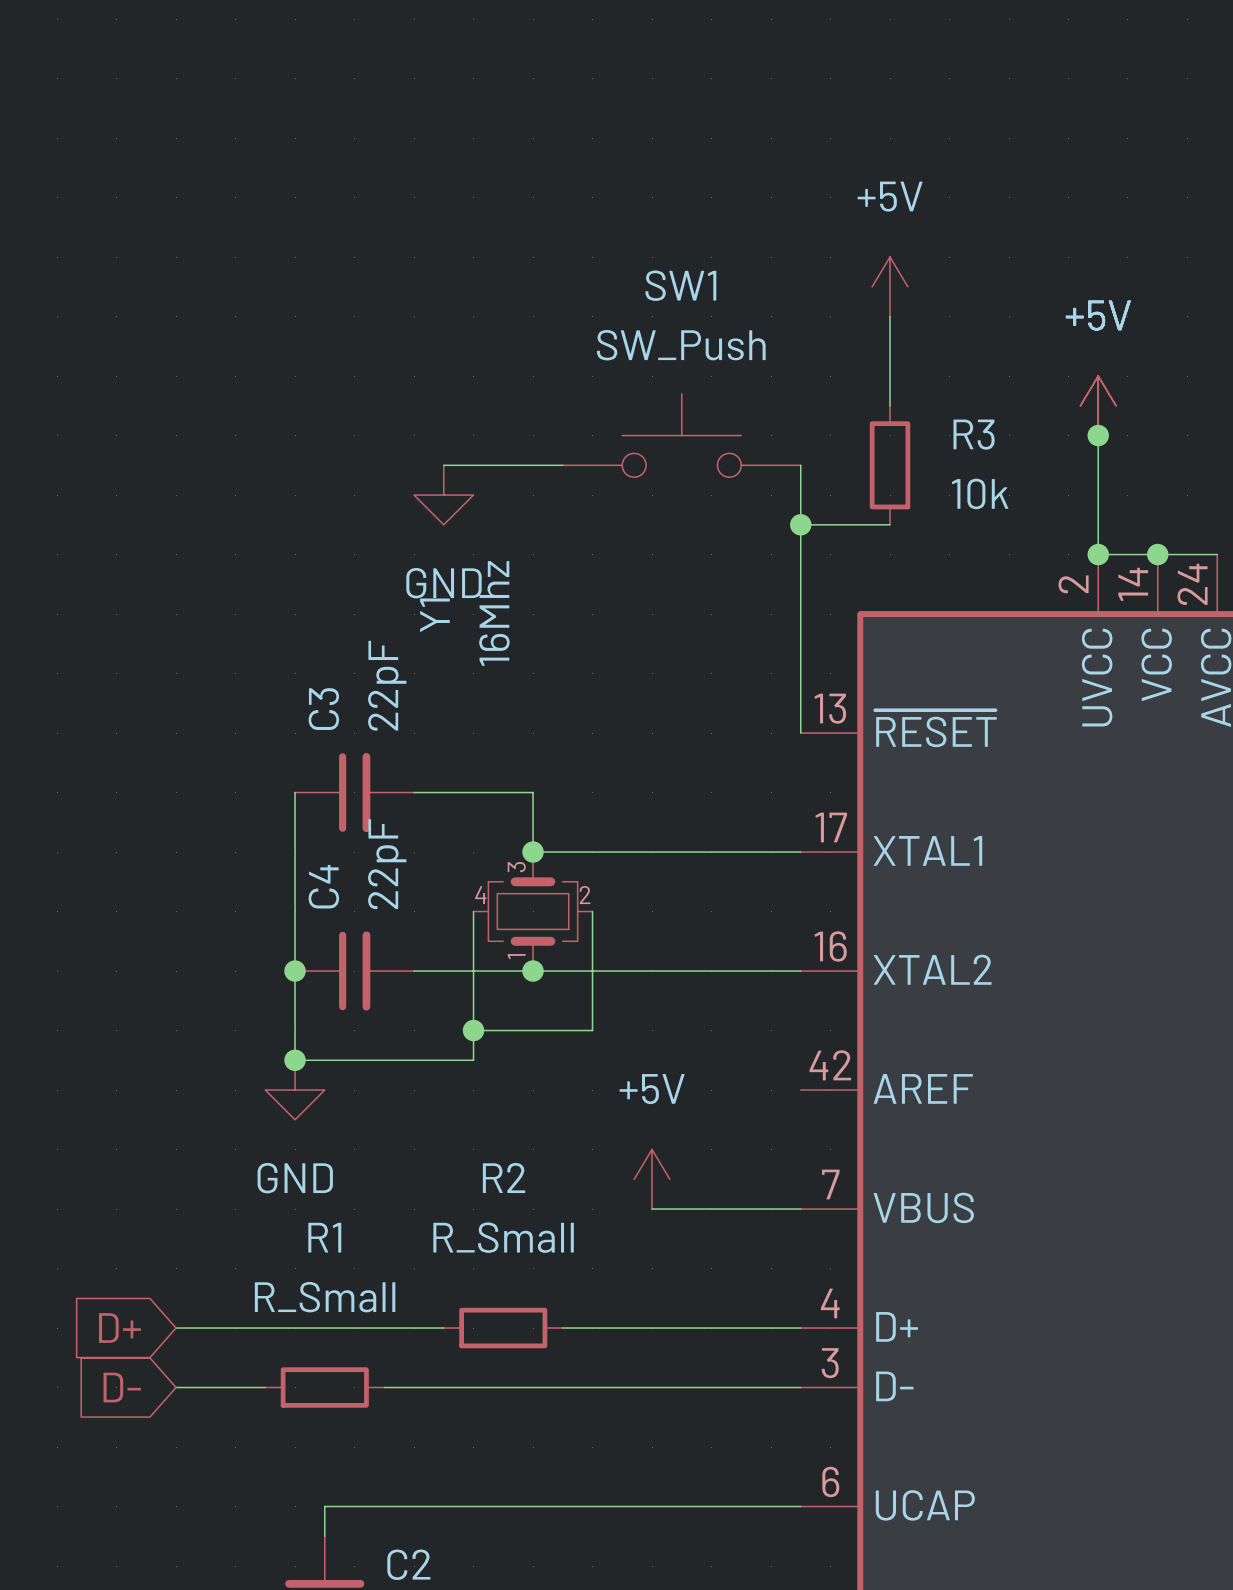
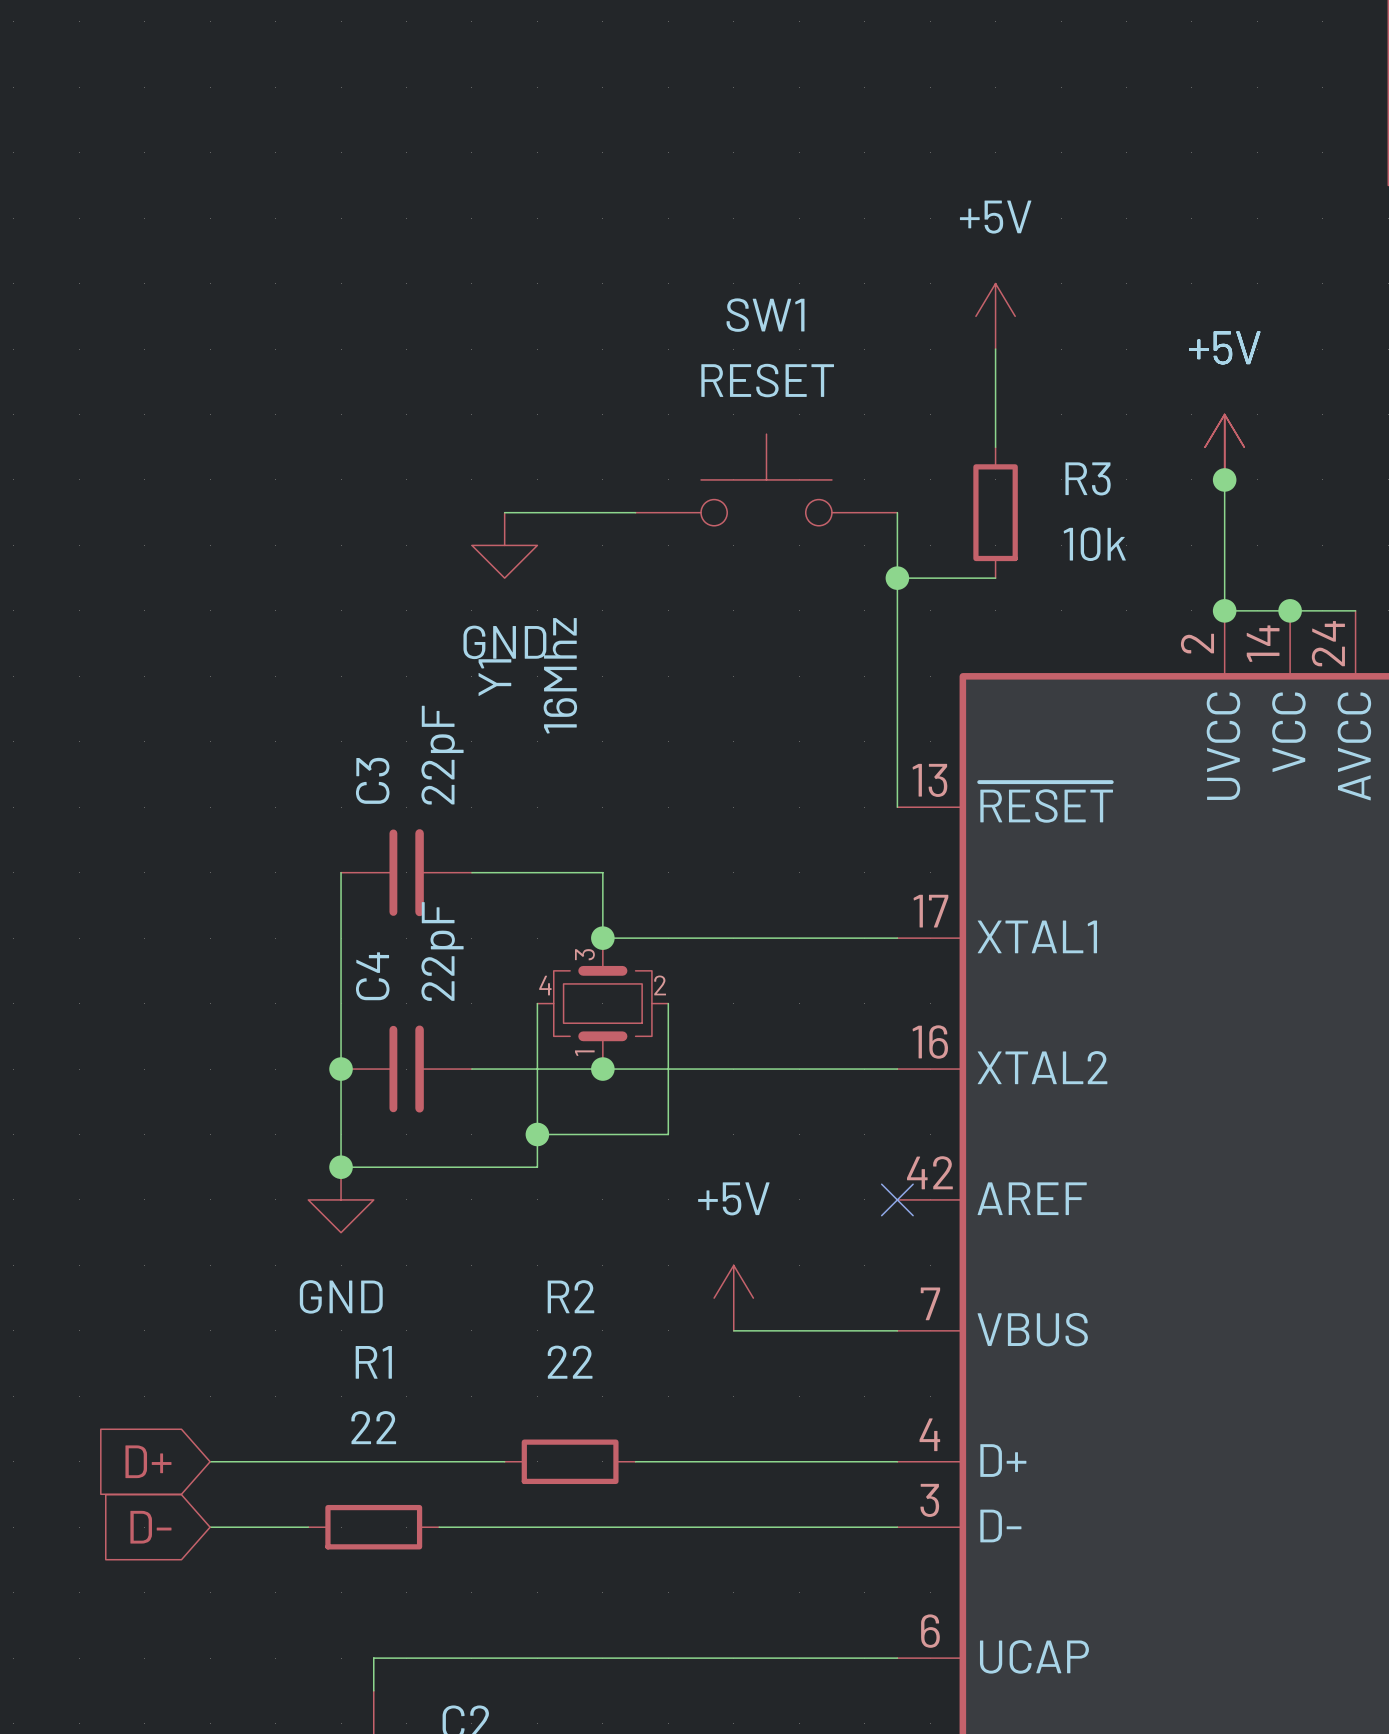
SW1 value: SW_Push (681, 345) -> RESET (767, 380)
no-connect mark: none -> (897, 1199)
R2 value: R_Small (503, 1237) -> 22 (570, 1362)
R1 value: R_Small (325, 1297) -> 22 (373, 1427)

